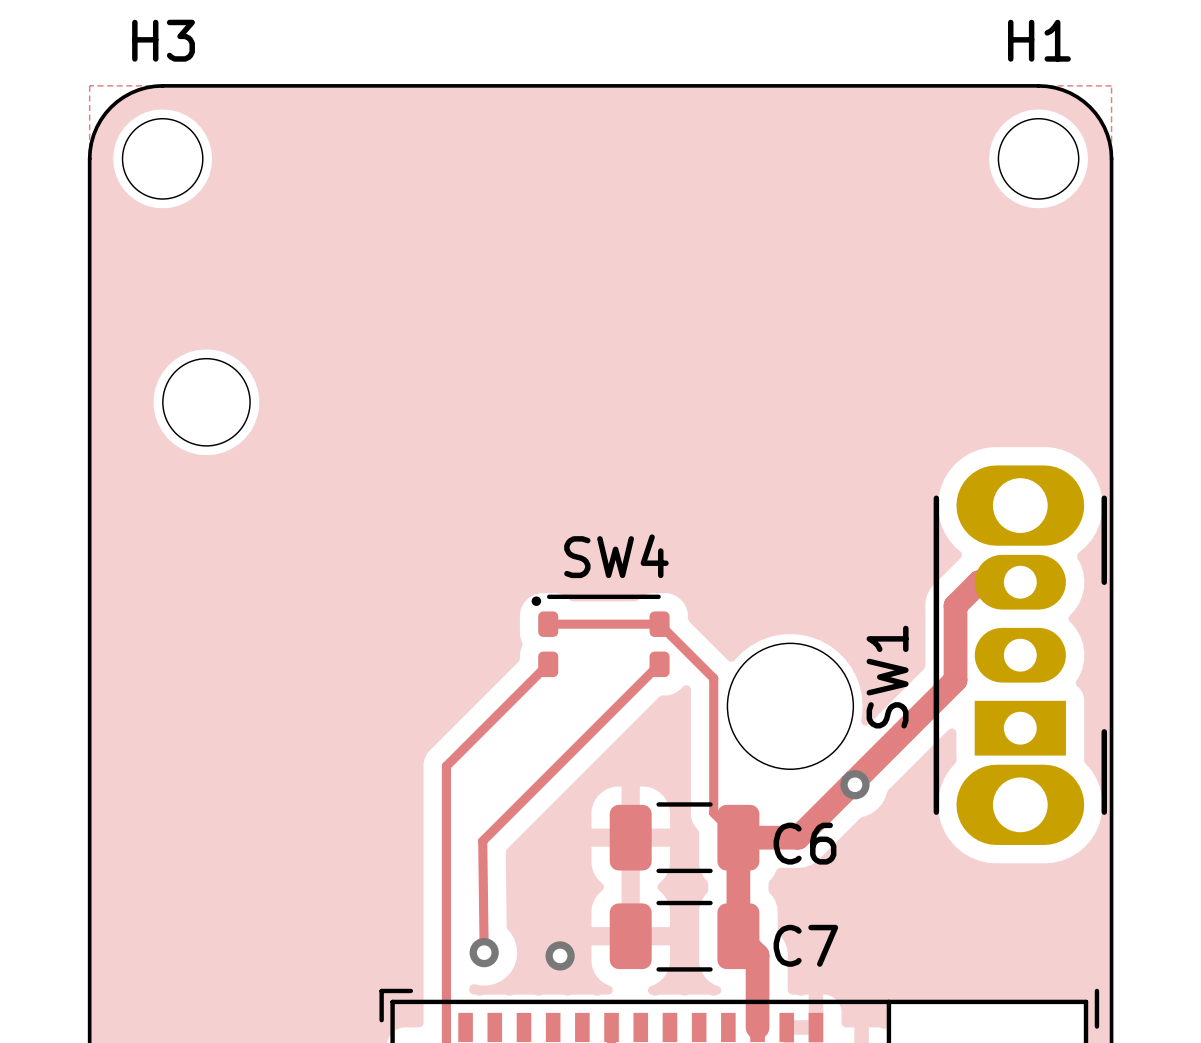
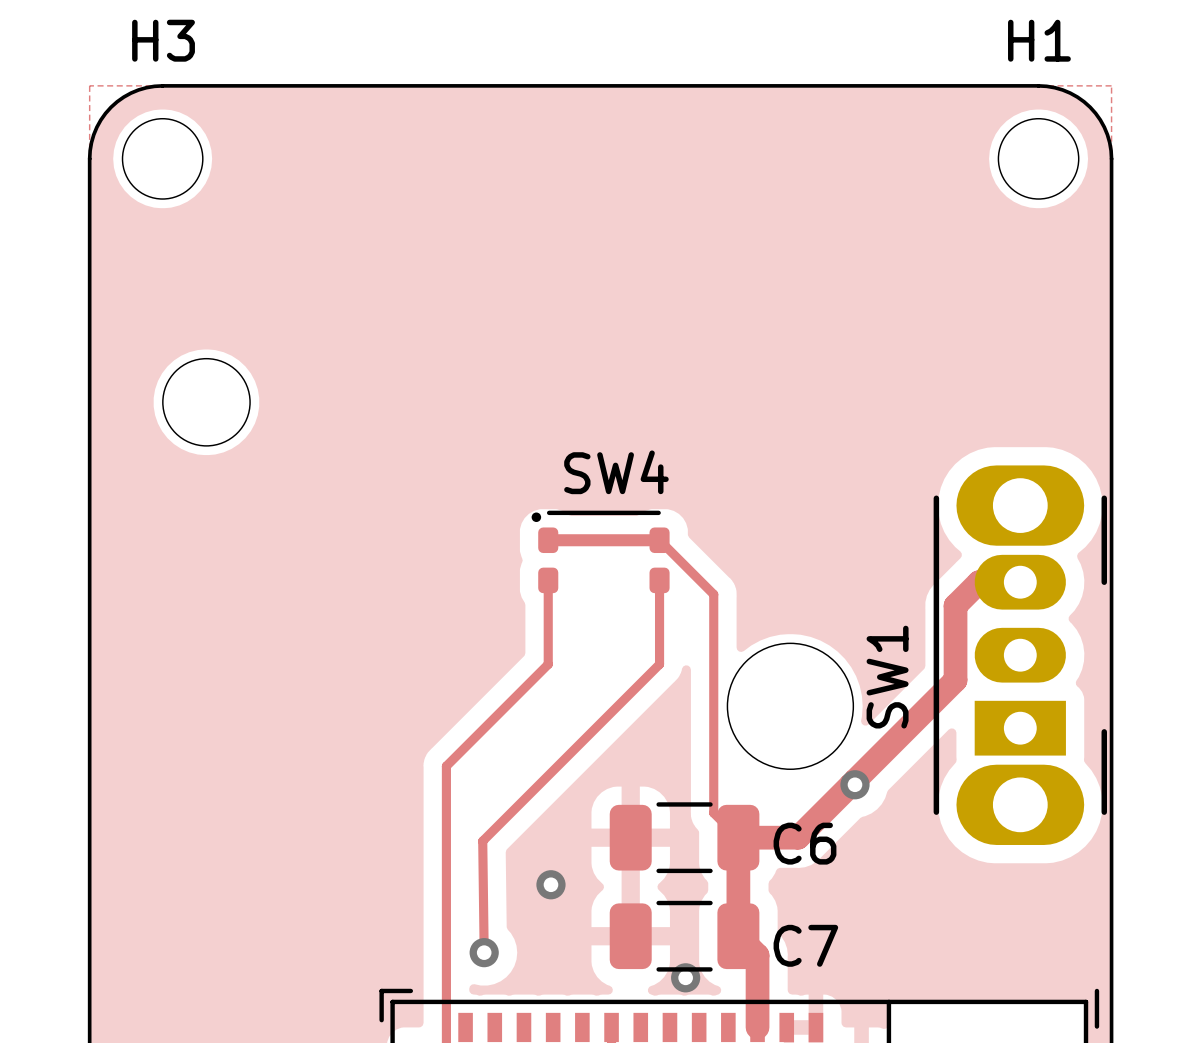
track: none -> (548, 580) (548, 664)
track: none -> (659, 580) (659, 664)
track: (548, 624) (659, 624) (713, 678) -> (548, 540) (659, 540) (713, 594) (713, 678)
SW4 position: (600, 635) -> (600, 551)
via: none -> (550, 884)
via: (560, 955) -> none
via: none -> (685, 977)

